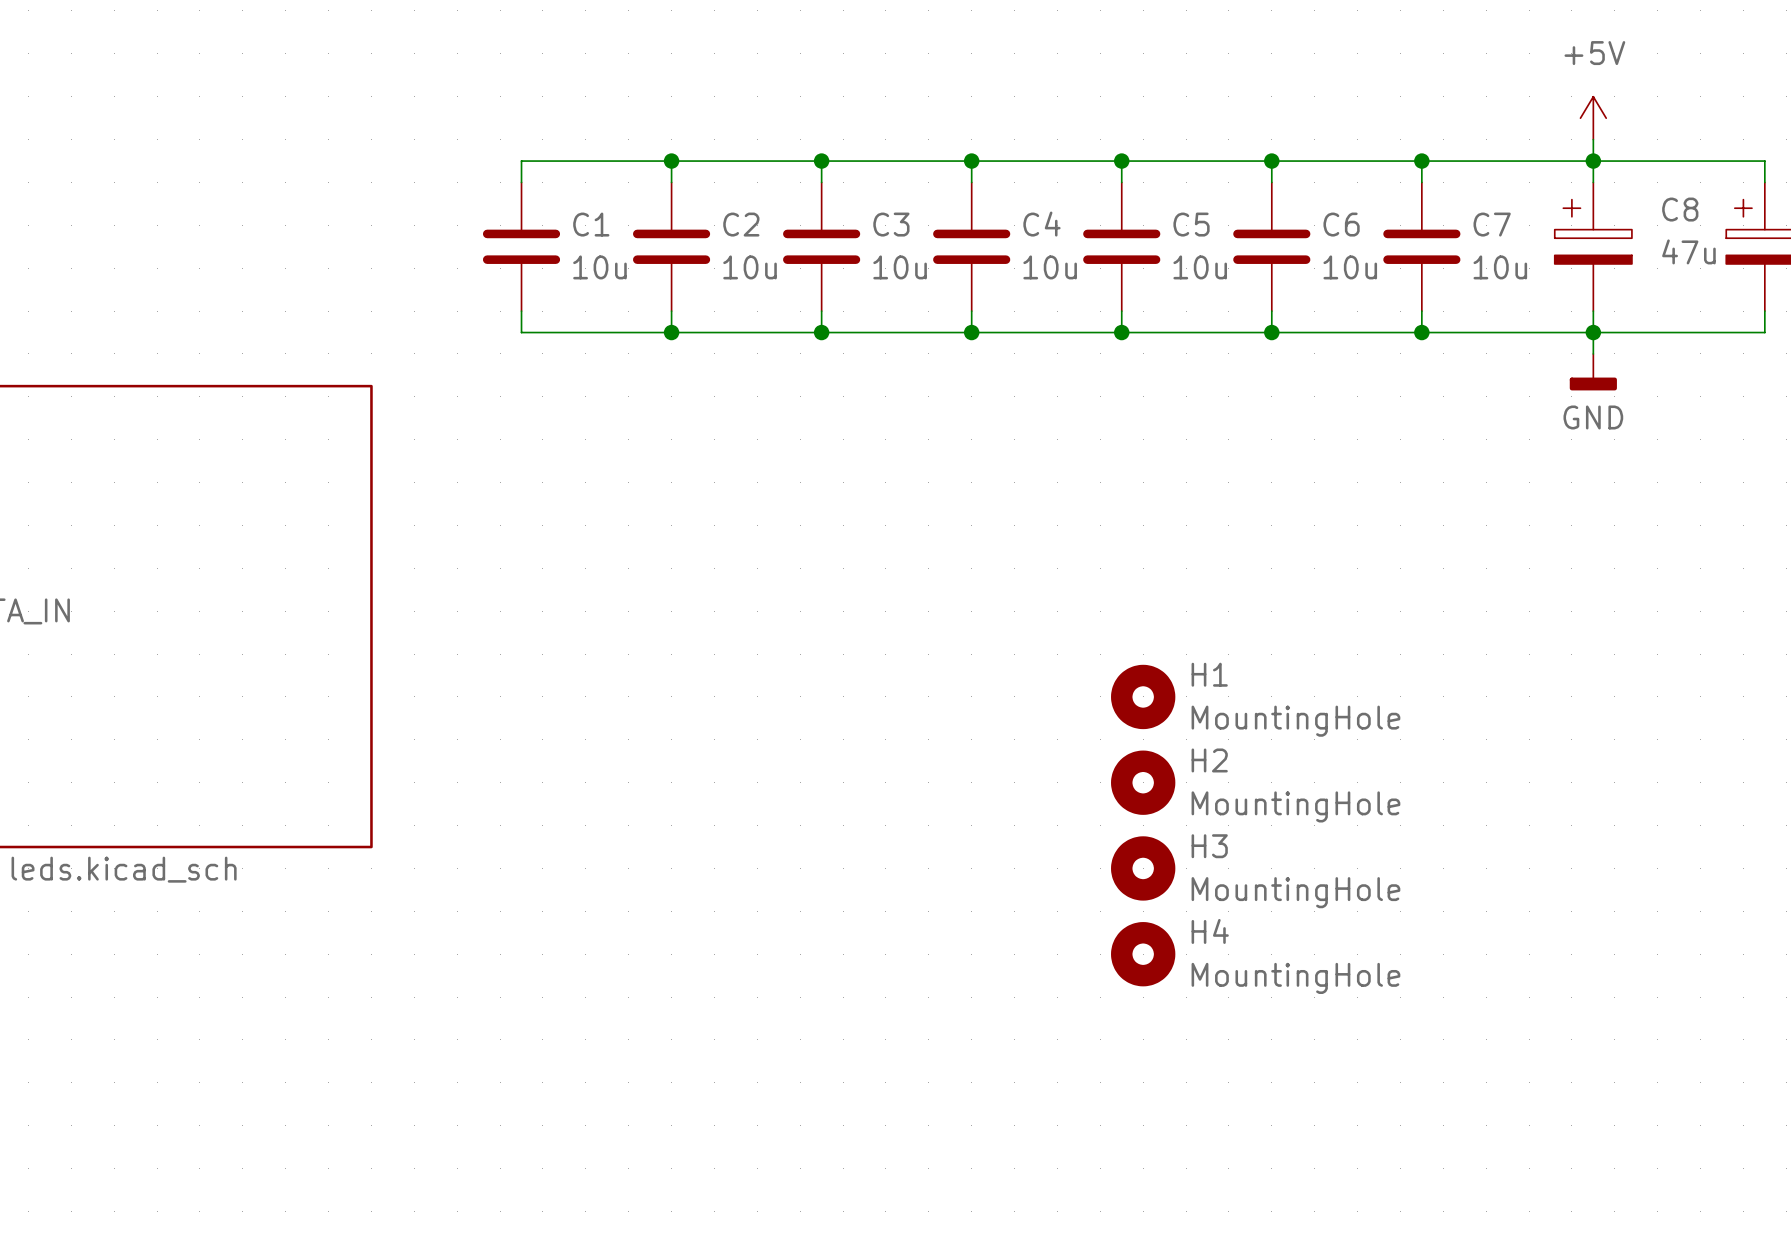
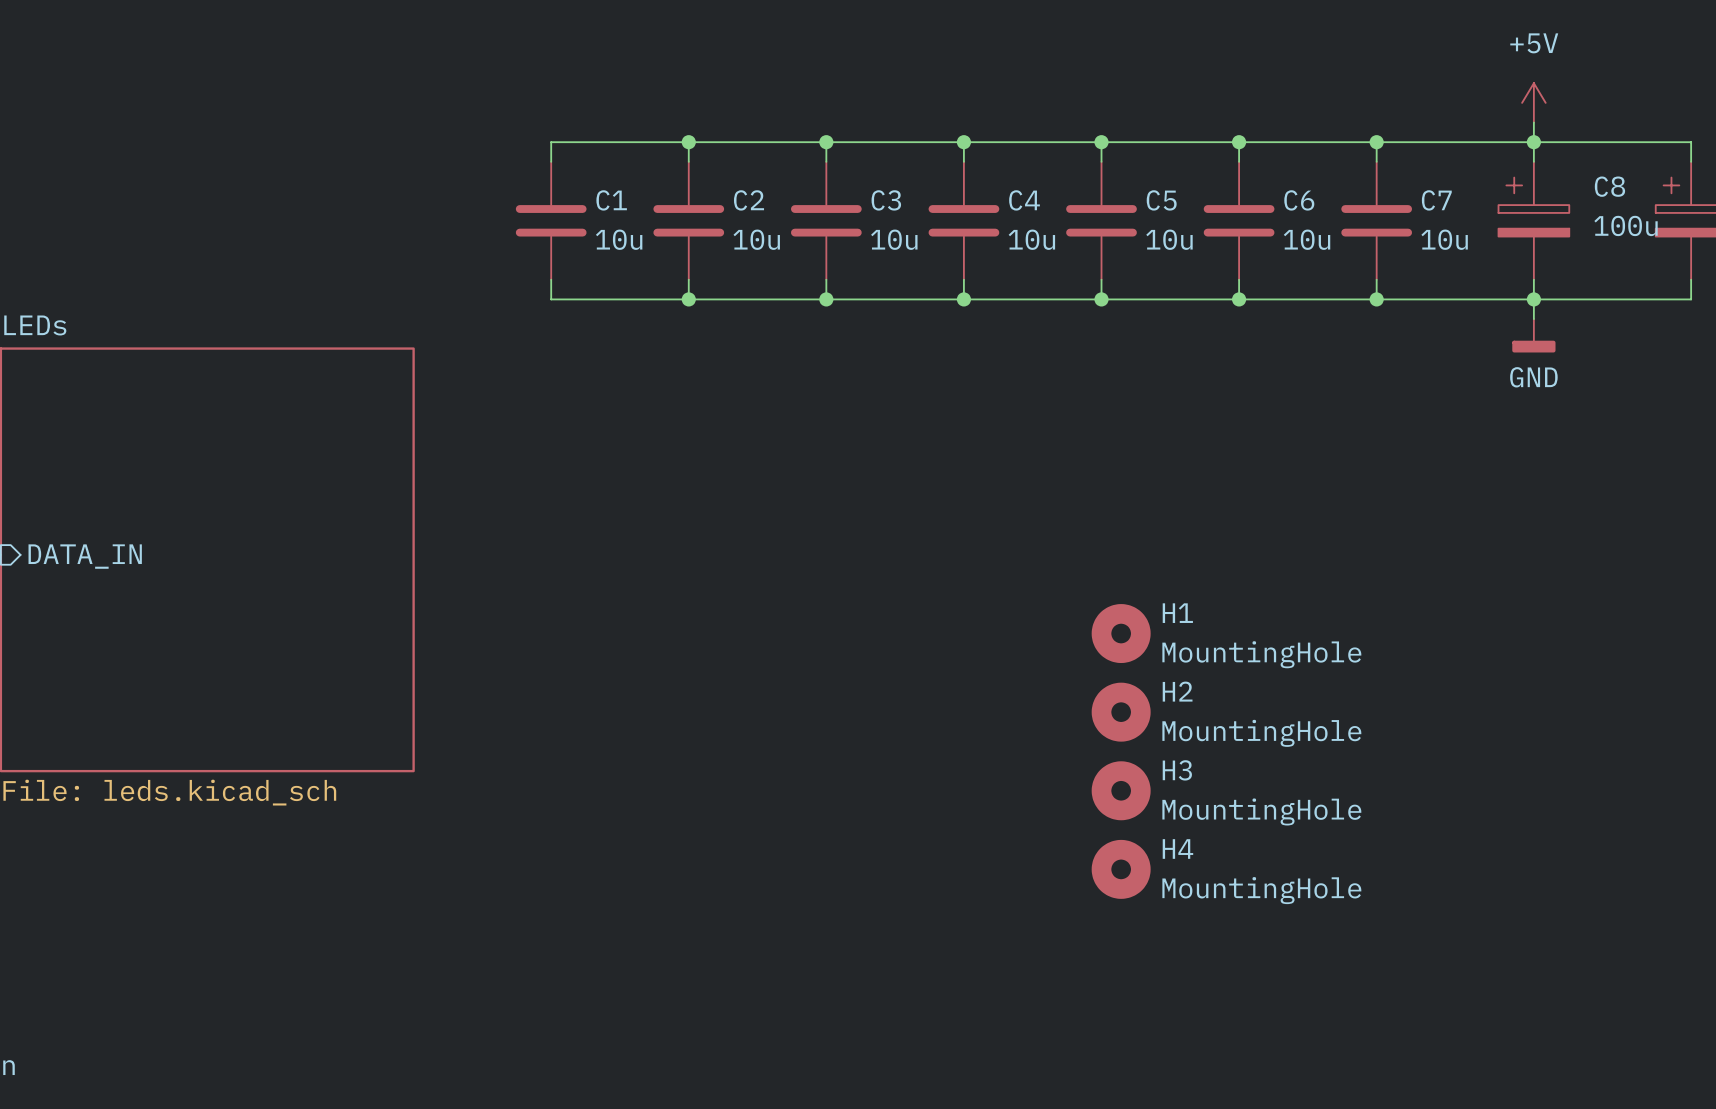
C8 value: 47u (1688, 251) -> 100u (1626, 225)

